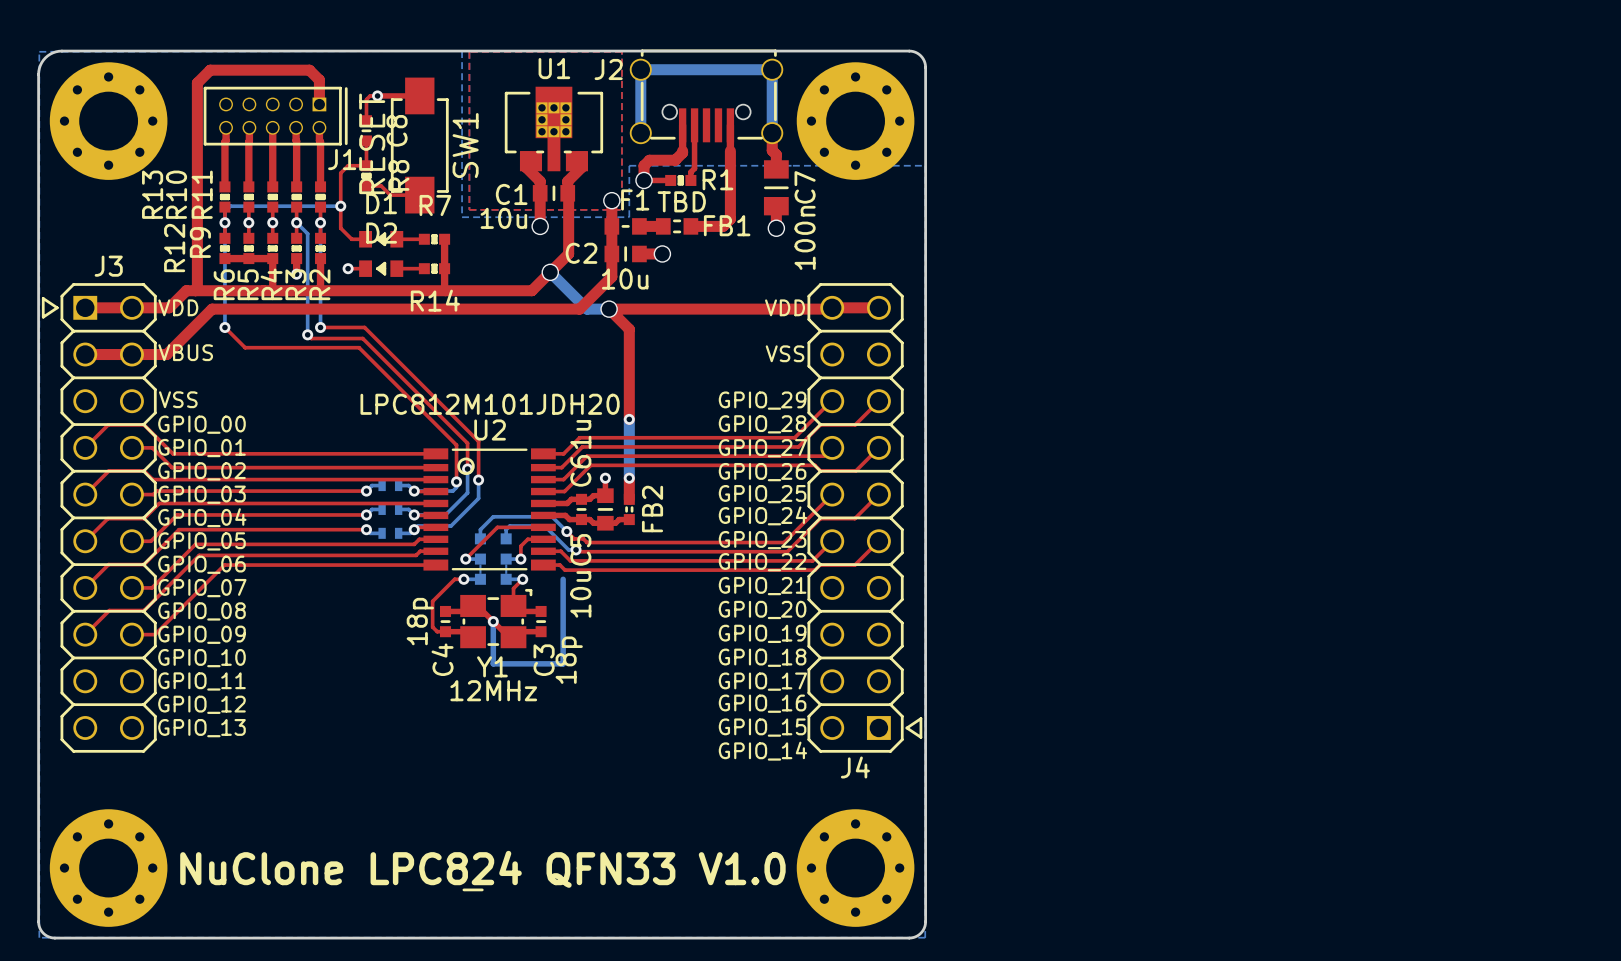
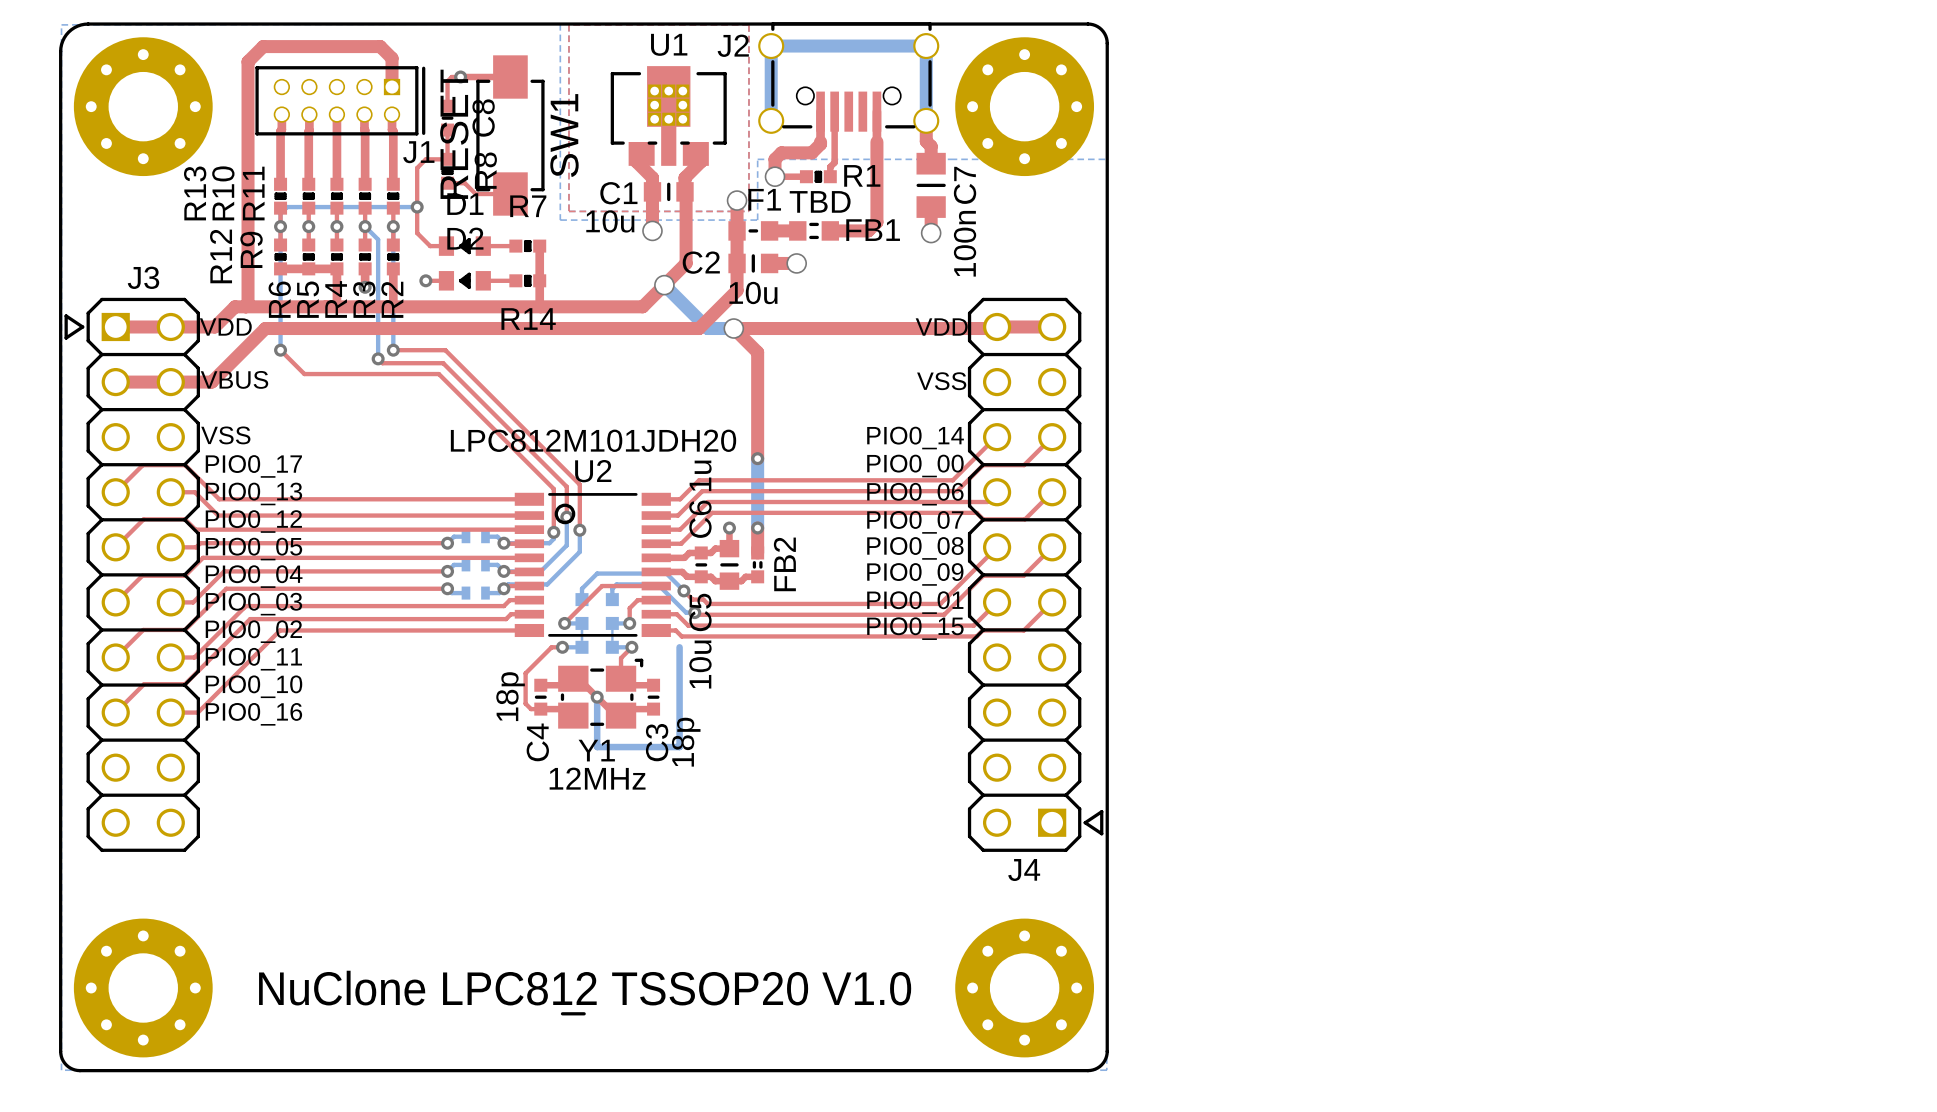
J3 footprint: [41, 283, 157, 753] -> [64, 297, 200, 852]
J4 footprint: [807, 283, 923, 753] -> [967, 297, 1104, 852]
drawing shape: [180, 850, 786, 892] -> [259, 970, 912, 1016]

